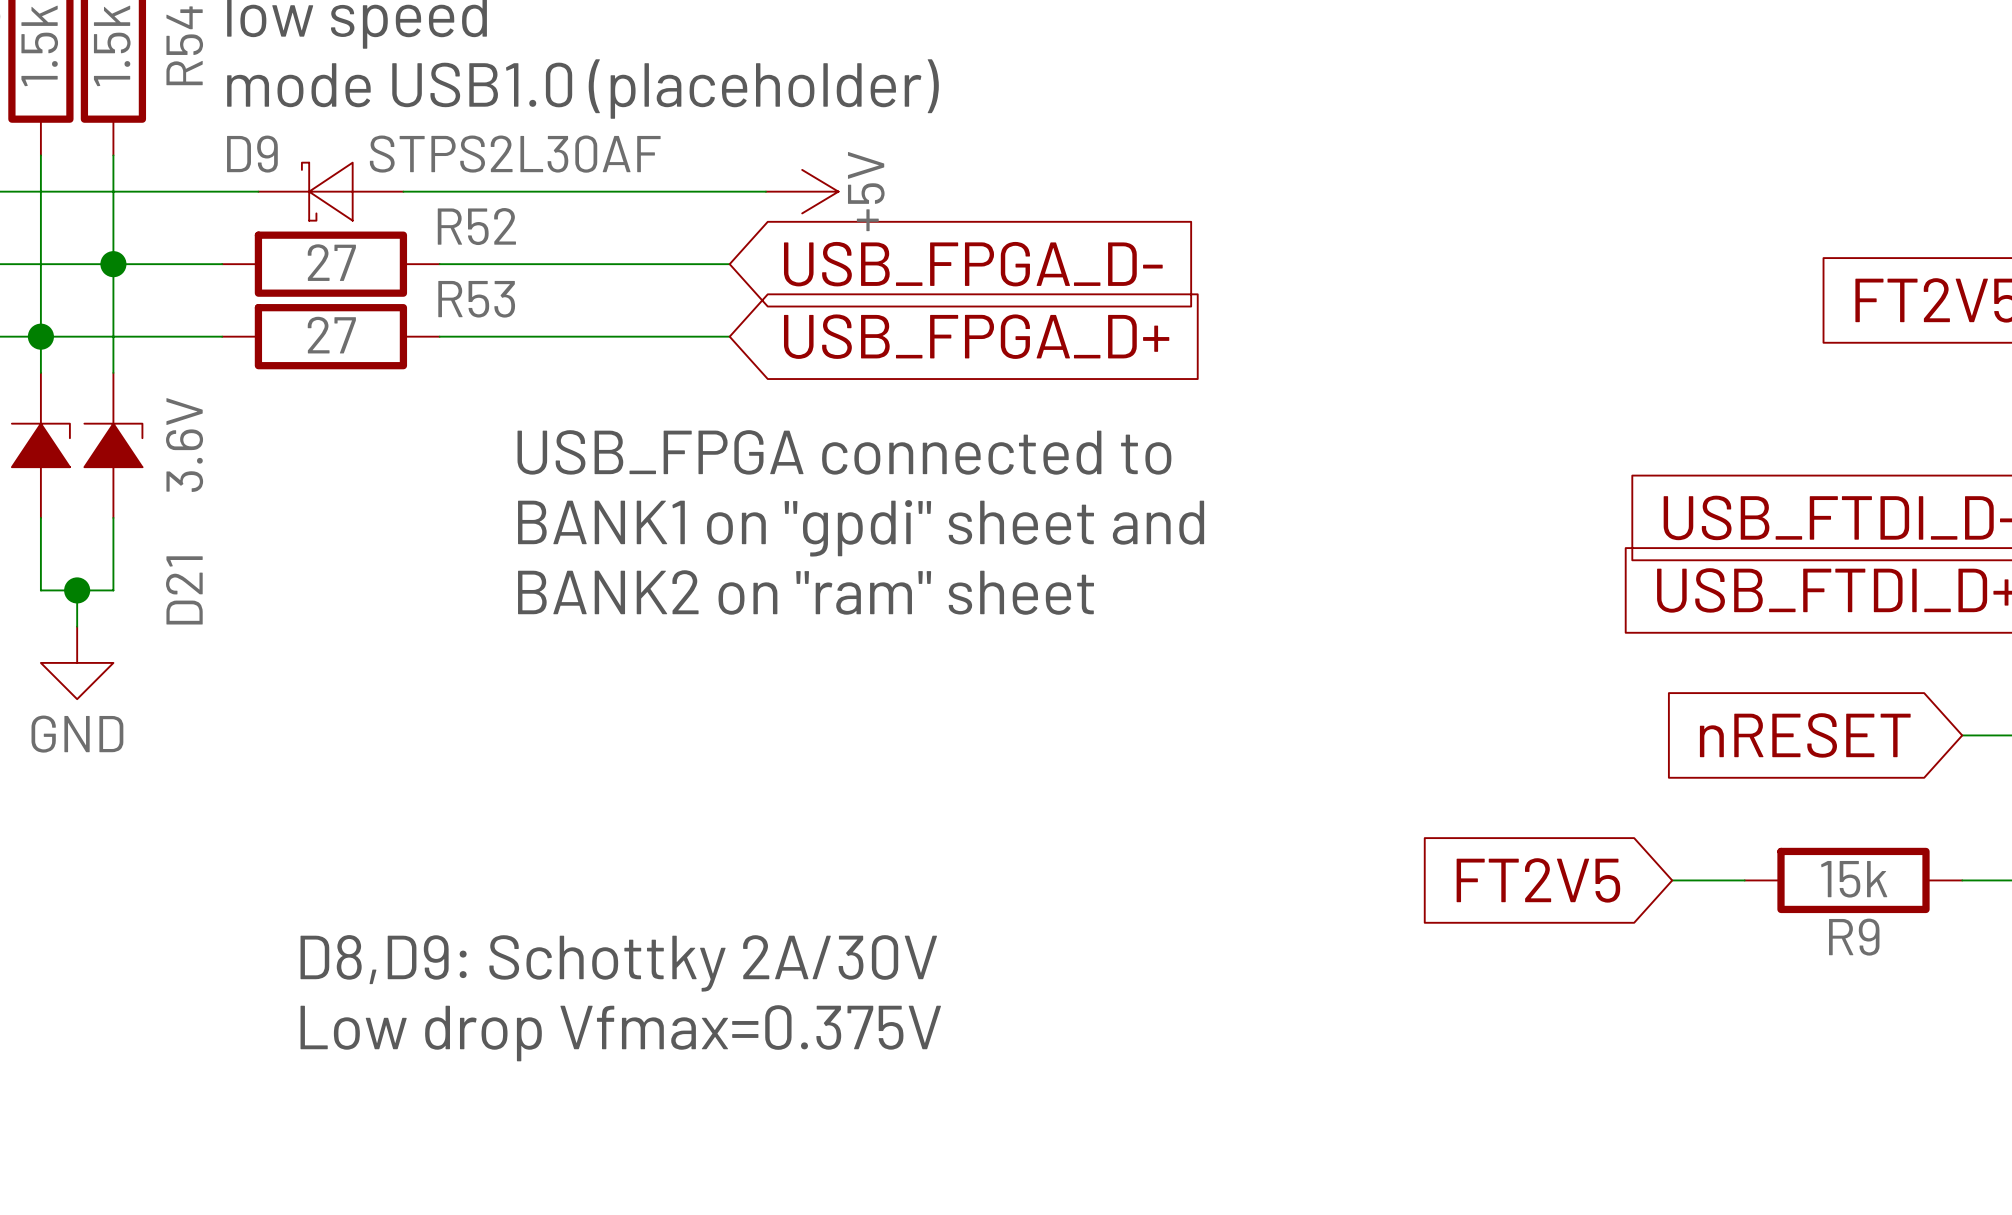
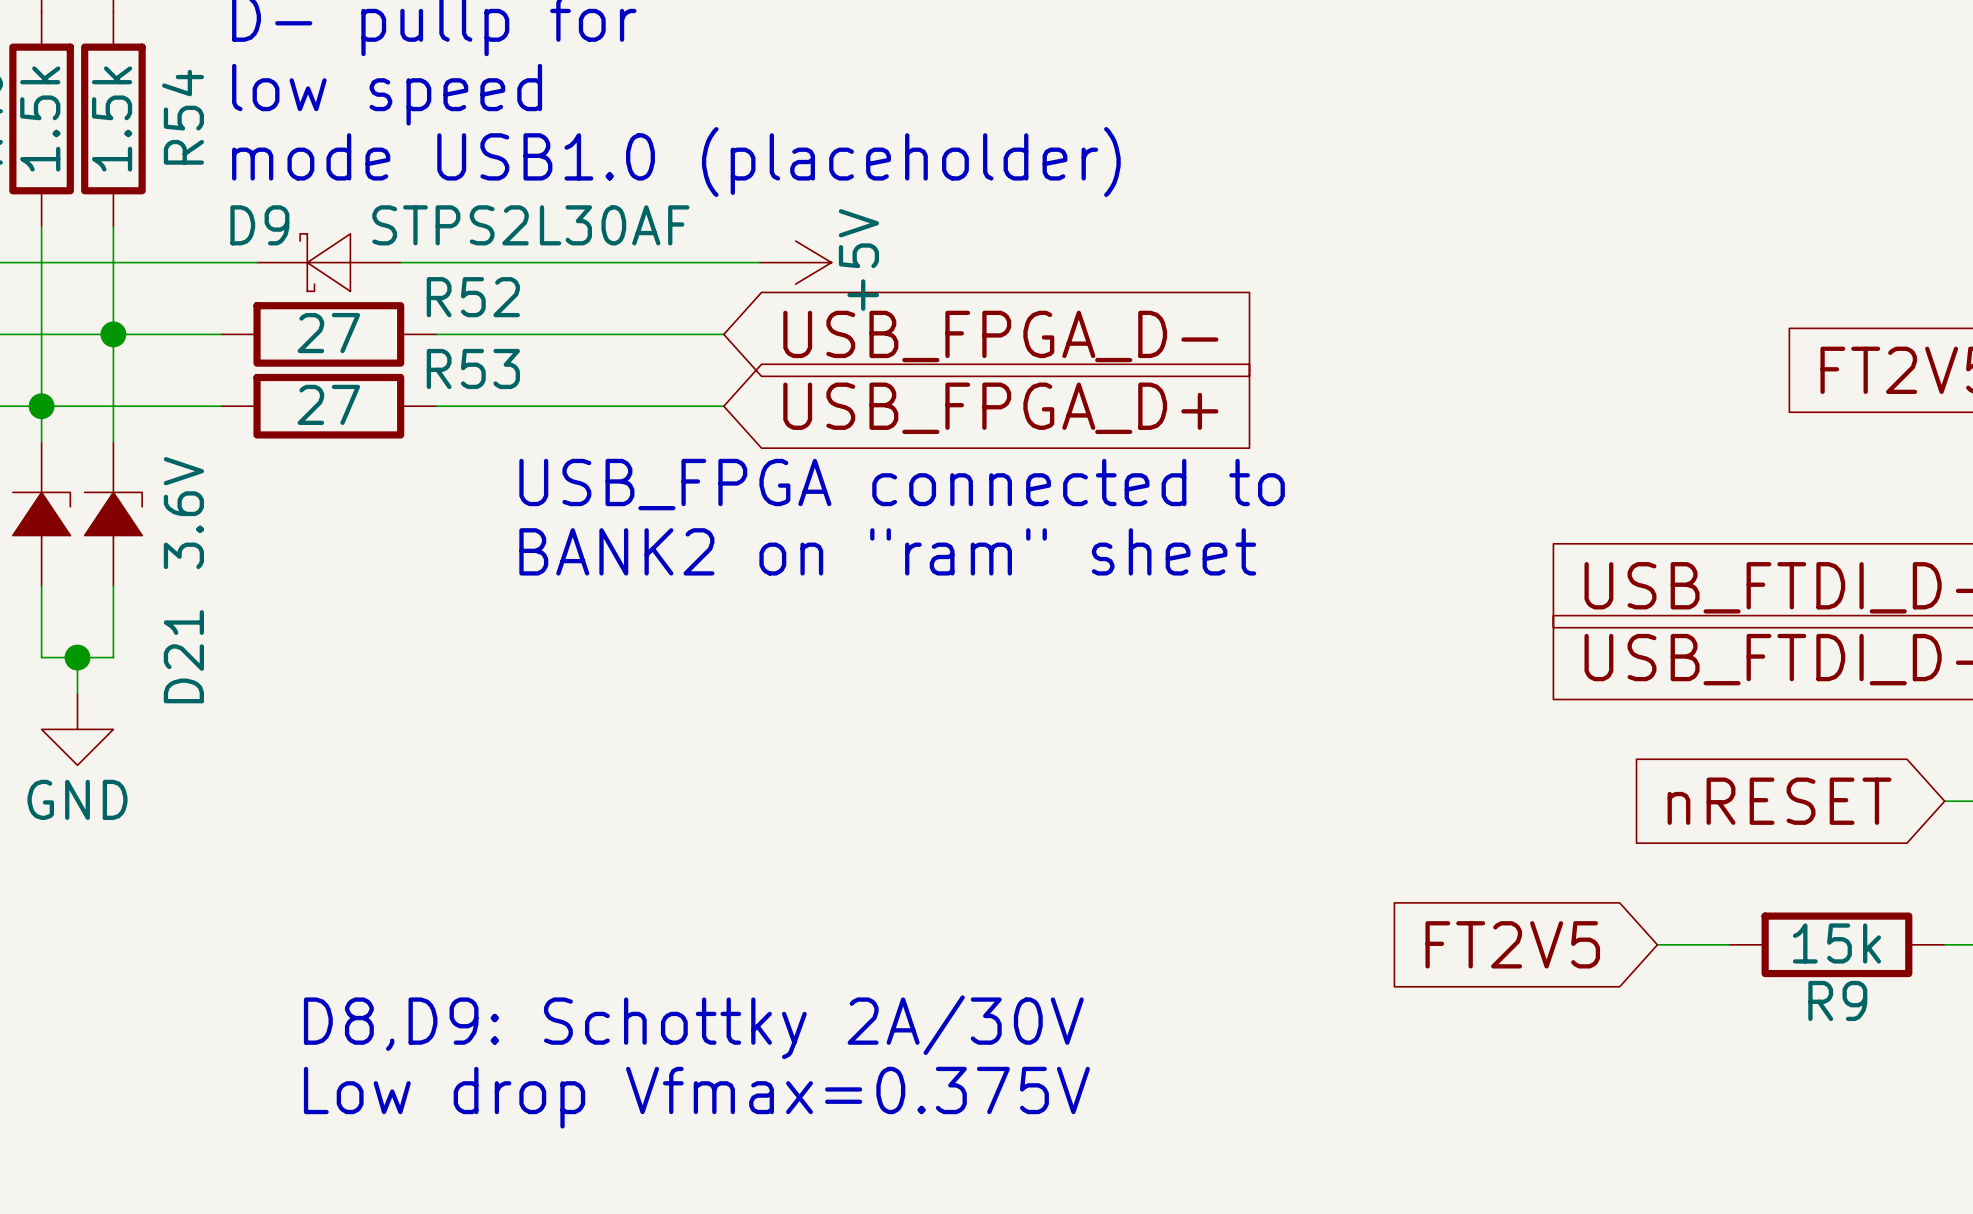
text position: USB_FPGA connected to (844, 452) -> USB_FPGA connected to (902, 484)
text: BANK1 on "gpdi" sheet and (861, 528) -> none
text position: BANK2 on "ram" sheet (806, 592) -> BANK2 on "ram" sheet (887, 551)

